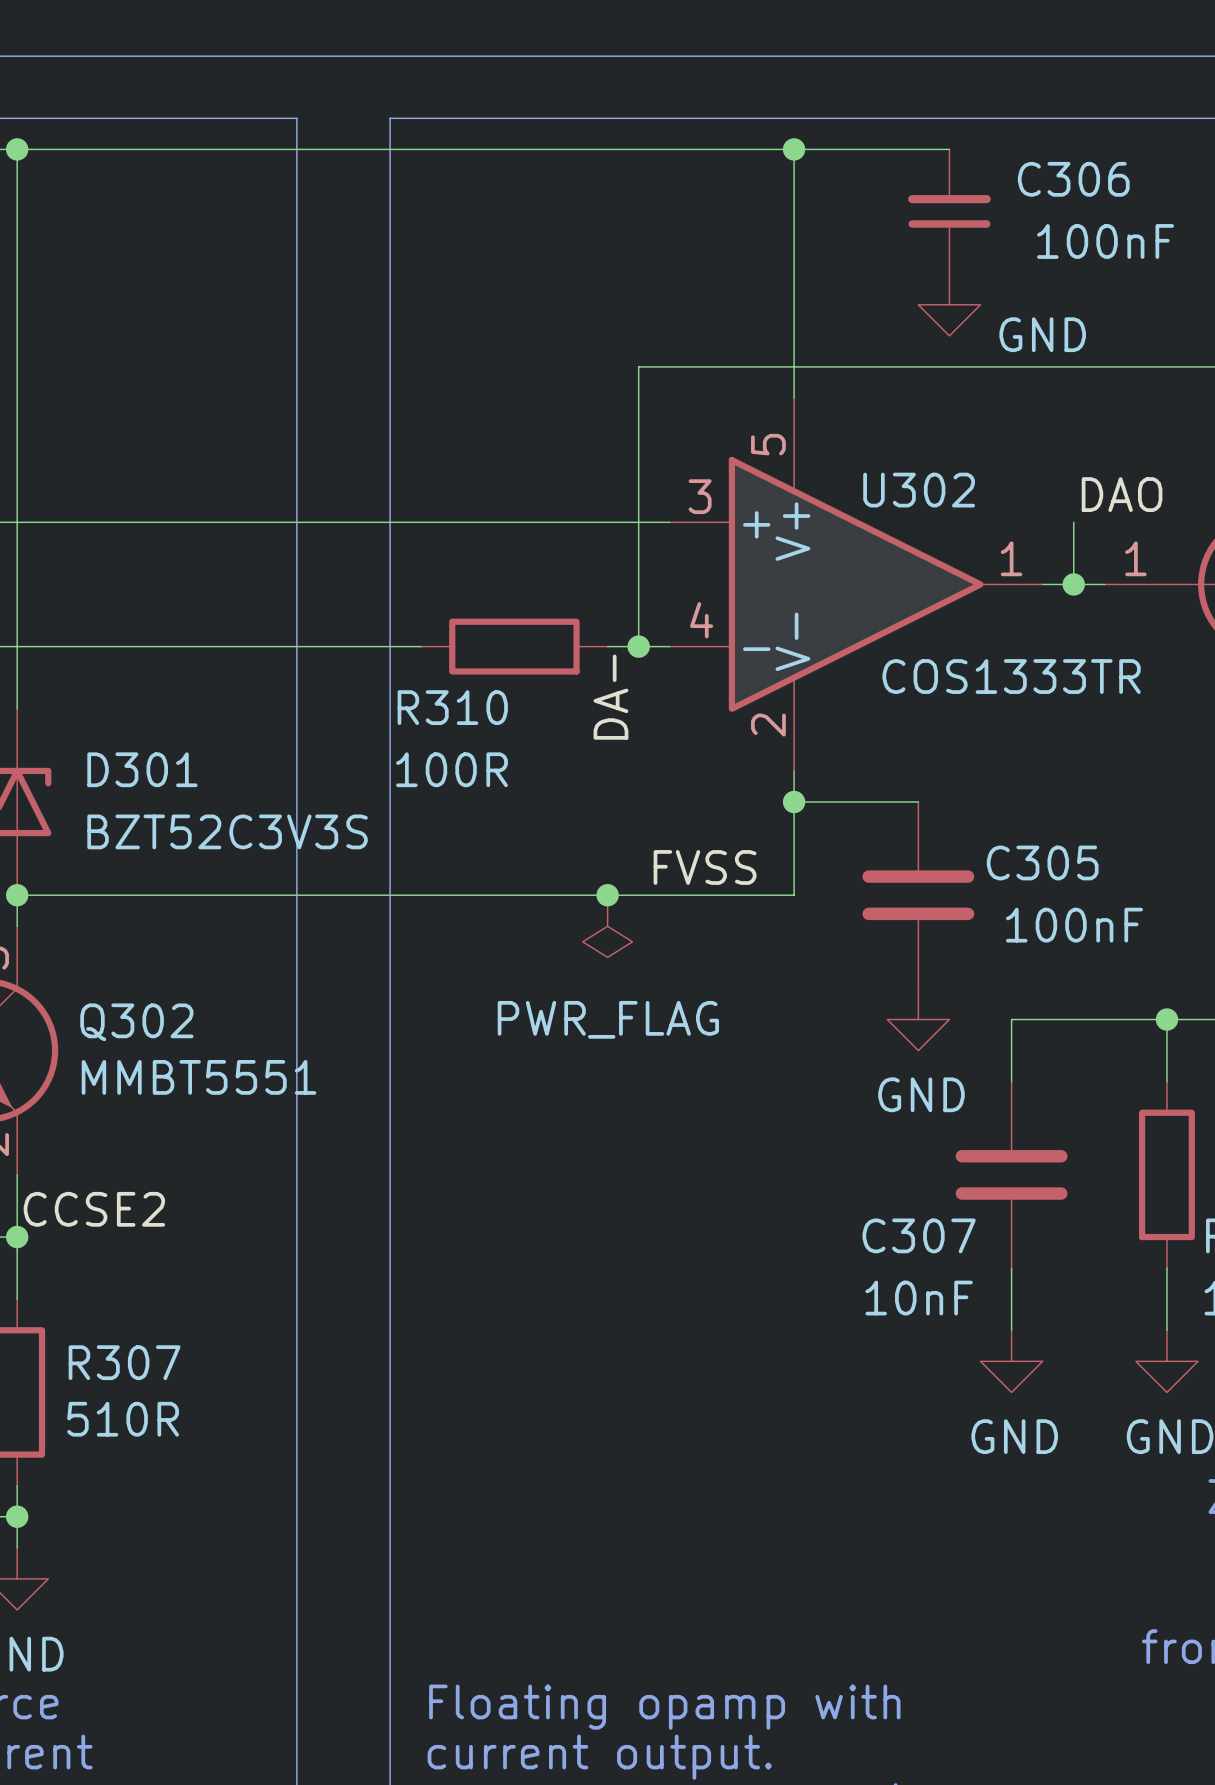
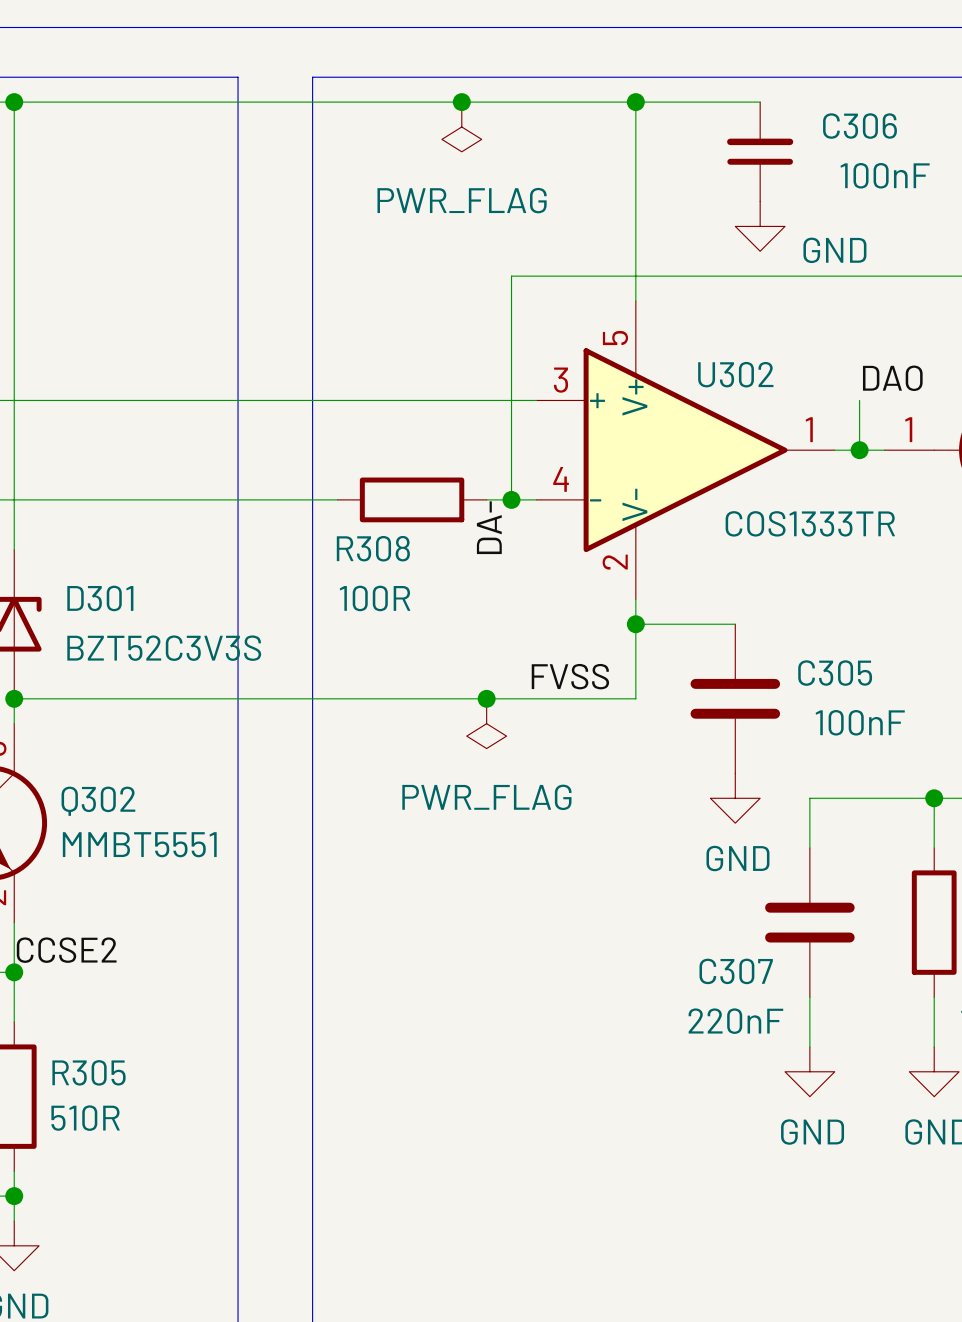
junction: none -> (461, 102)
power symbol: none -> PWR_FLAG (461, 126)
R310 name: R310 (452, 707) -> R308 (373, 548)
C307 value: 10nF (919, 1298) -> 220nF (735, 1021)
R307 name: R307 (124, 1362) -> R305 (89, 1072)

